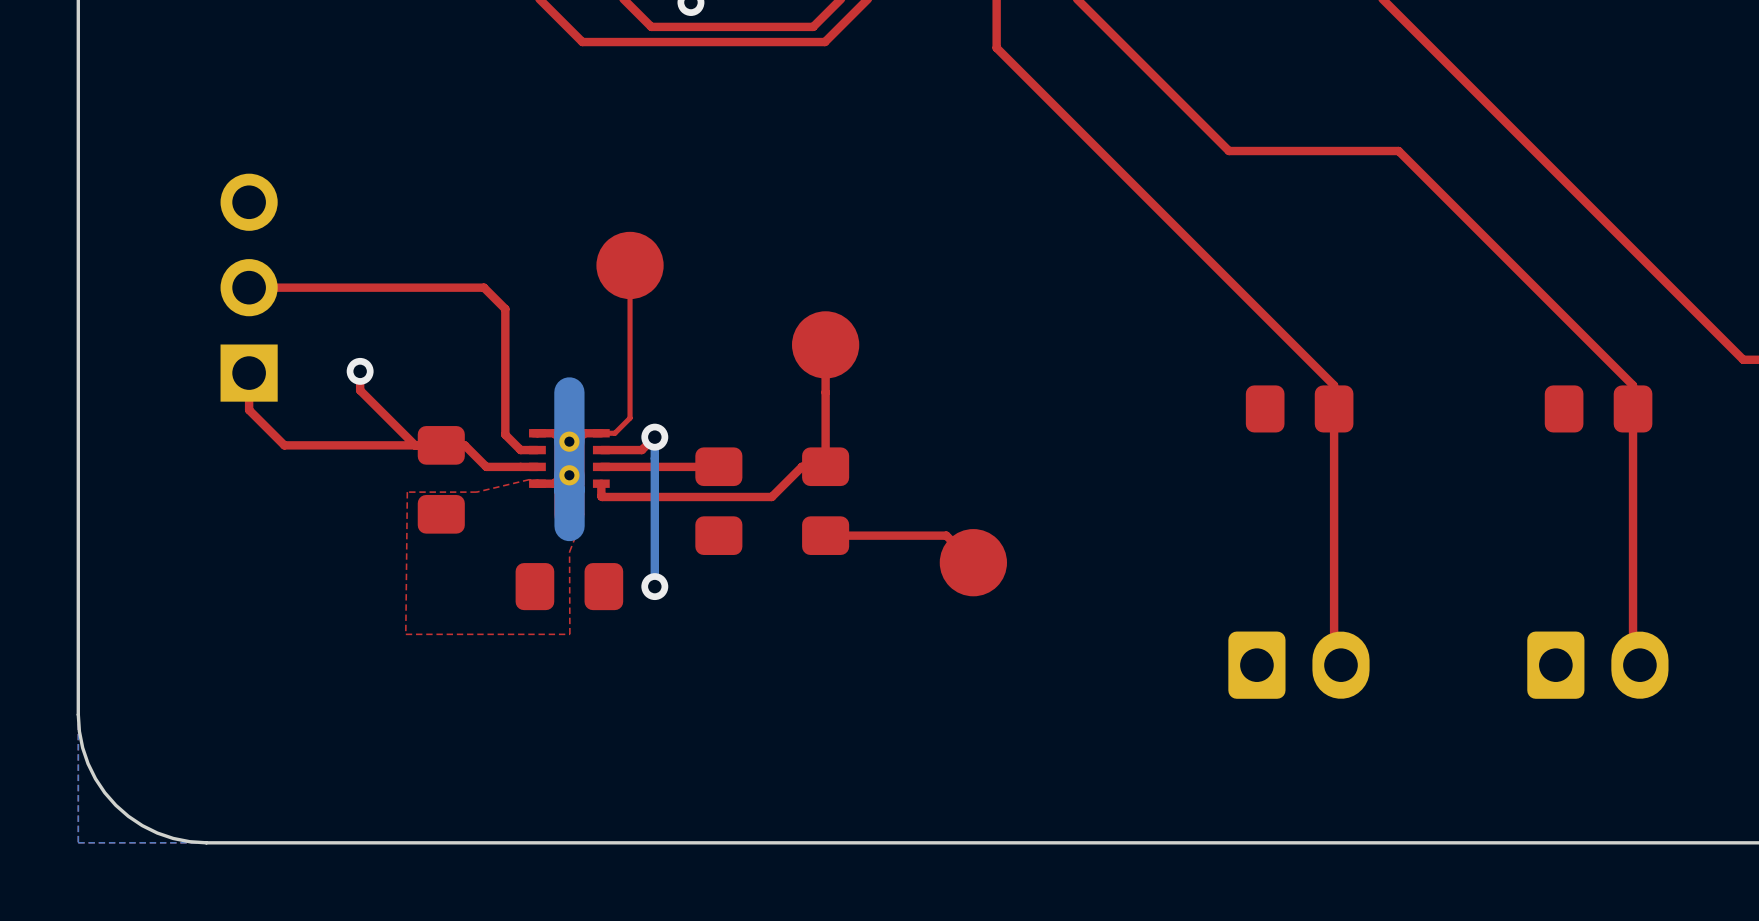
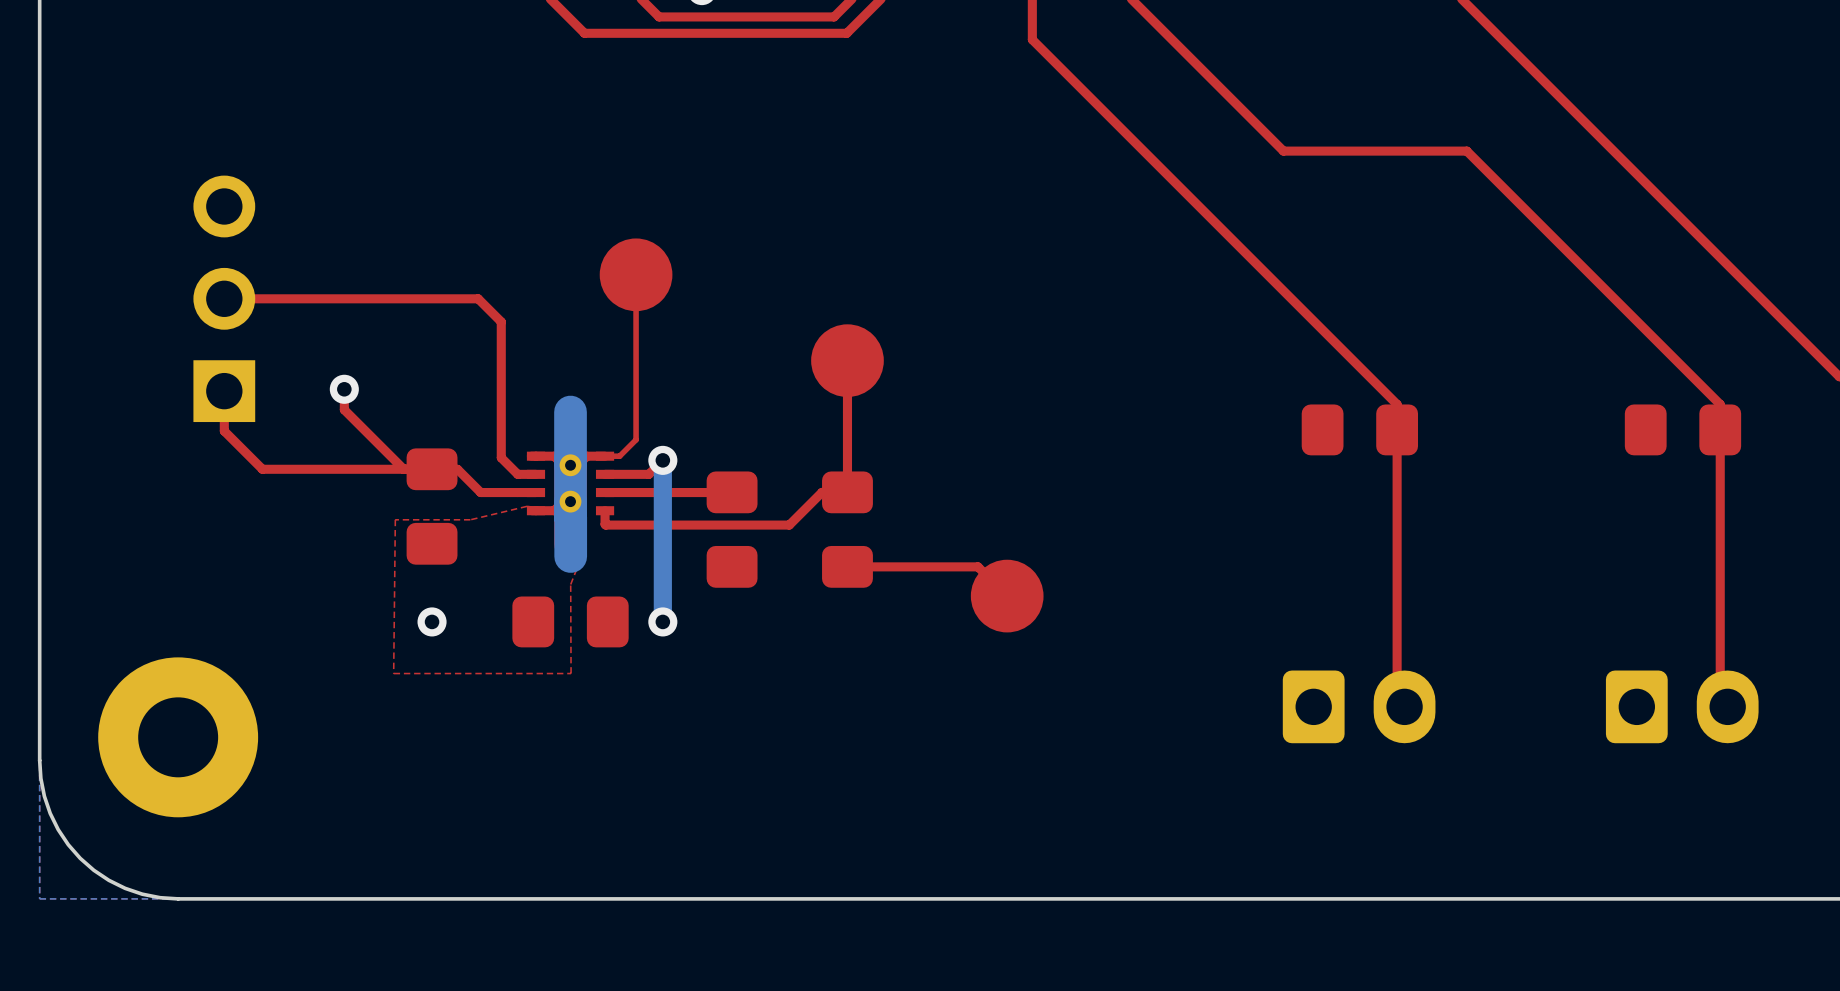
bottom track width: thin (654, 437) (654, 586) -> thick (662, 460) (662, 621)
via: none -> (432, 621)
part: none -> (178, 737)

